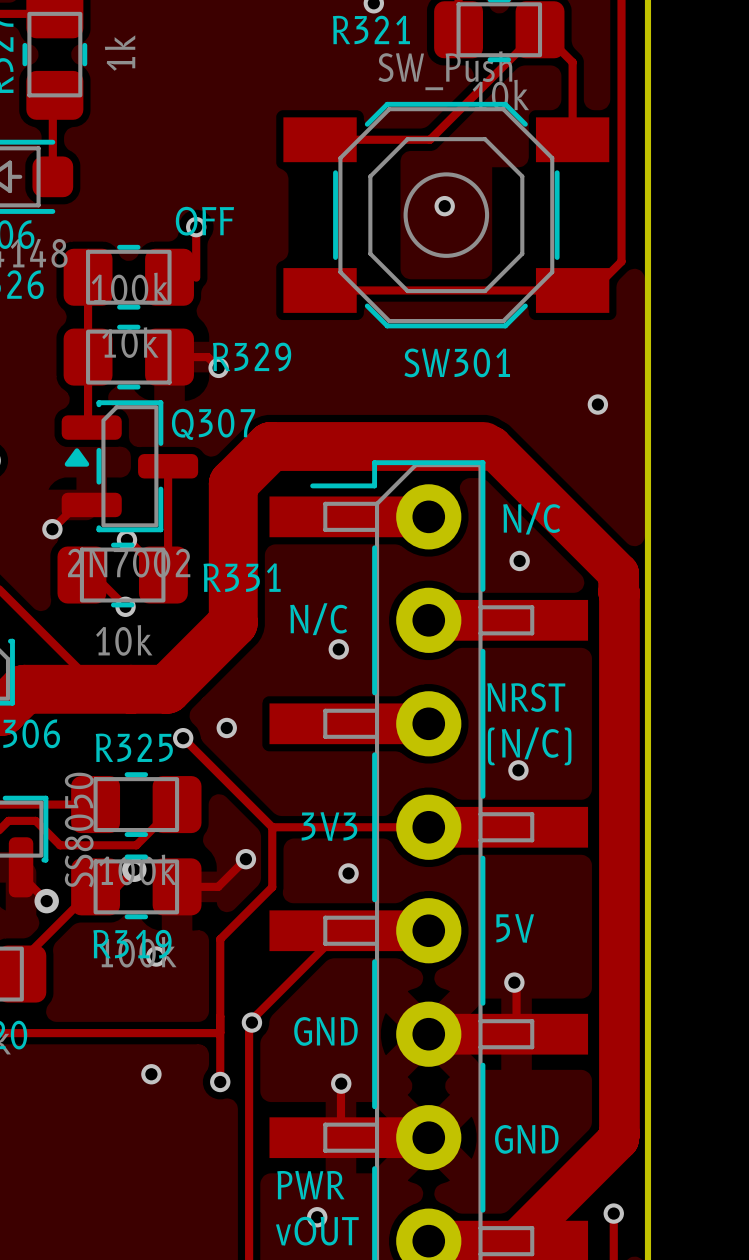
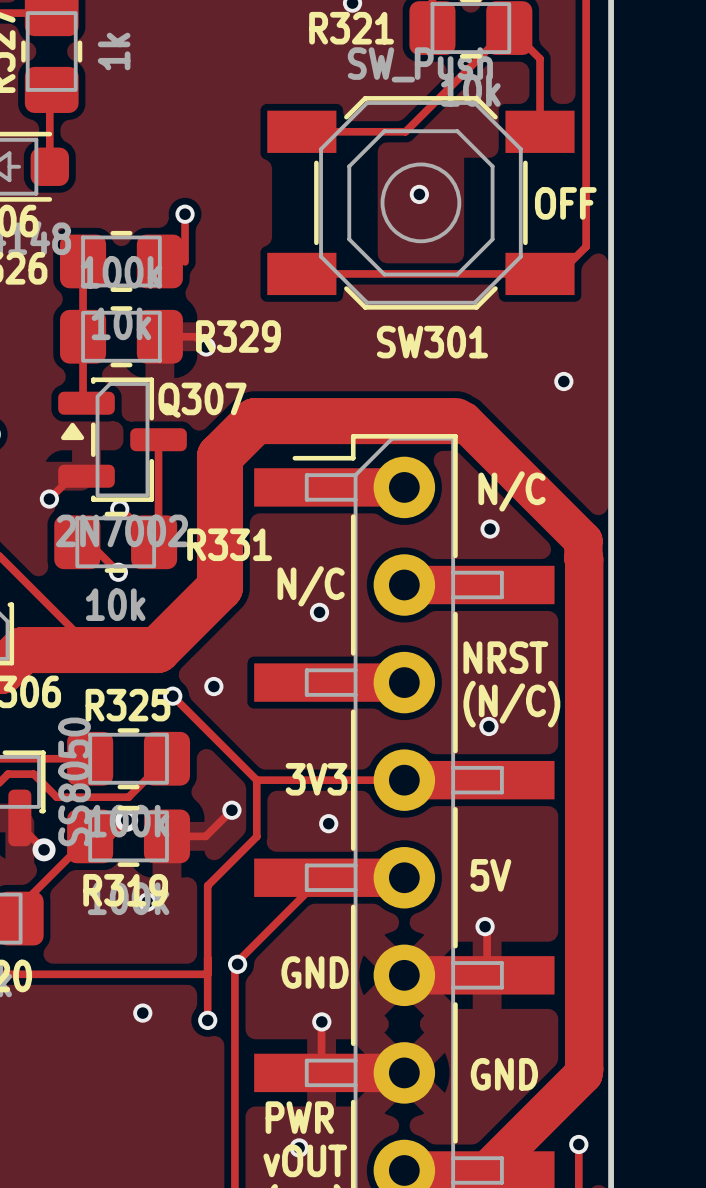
text position: OFF (204, 221) -> OFF (565, 203)

